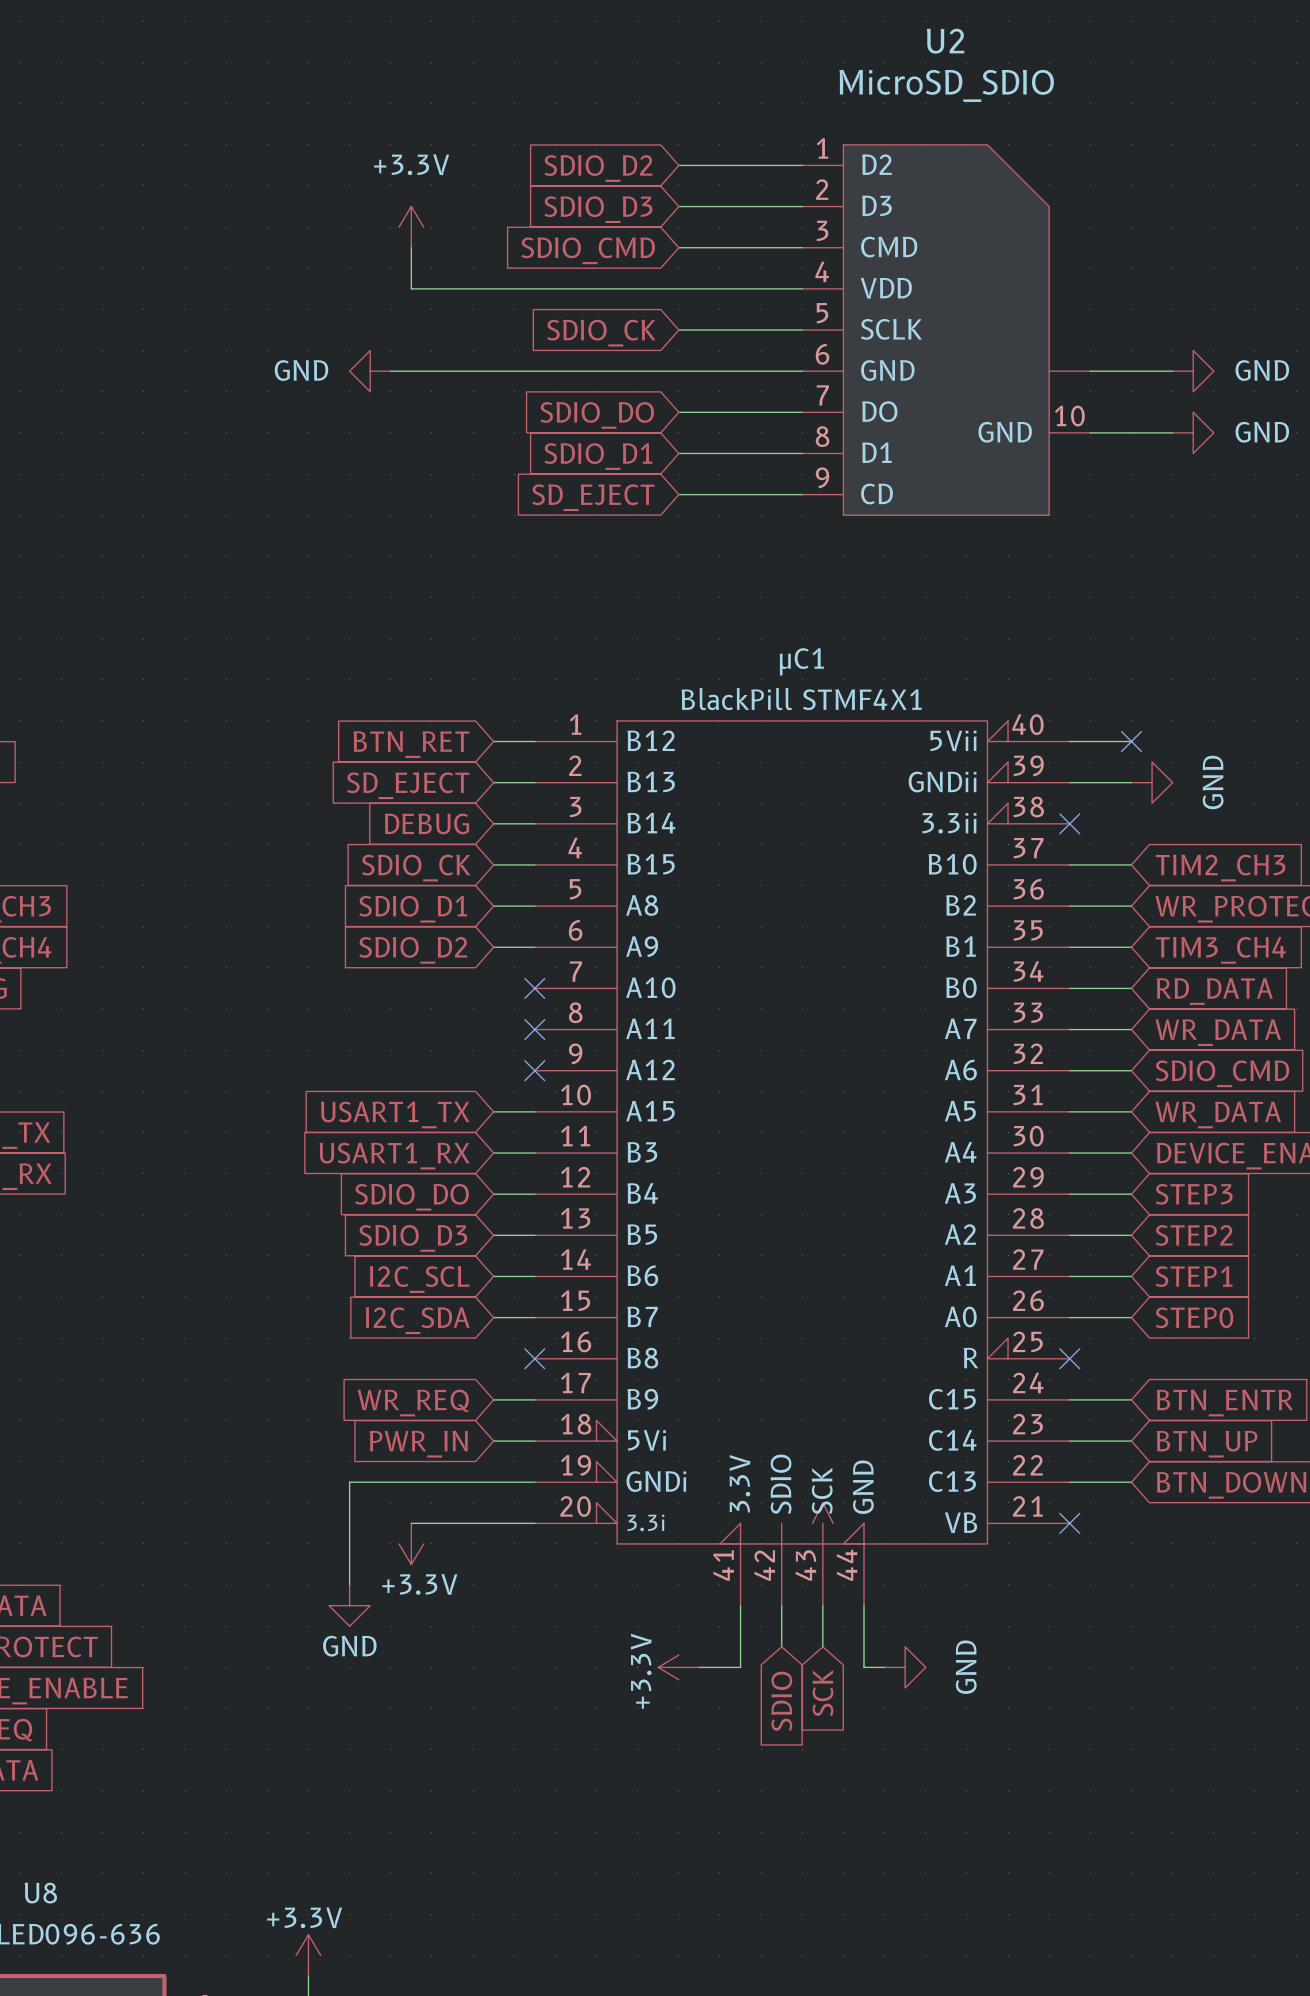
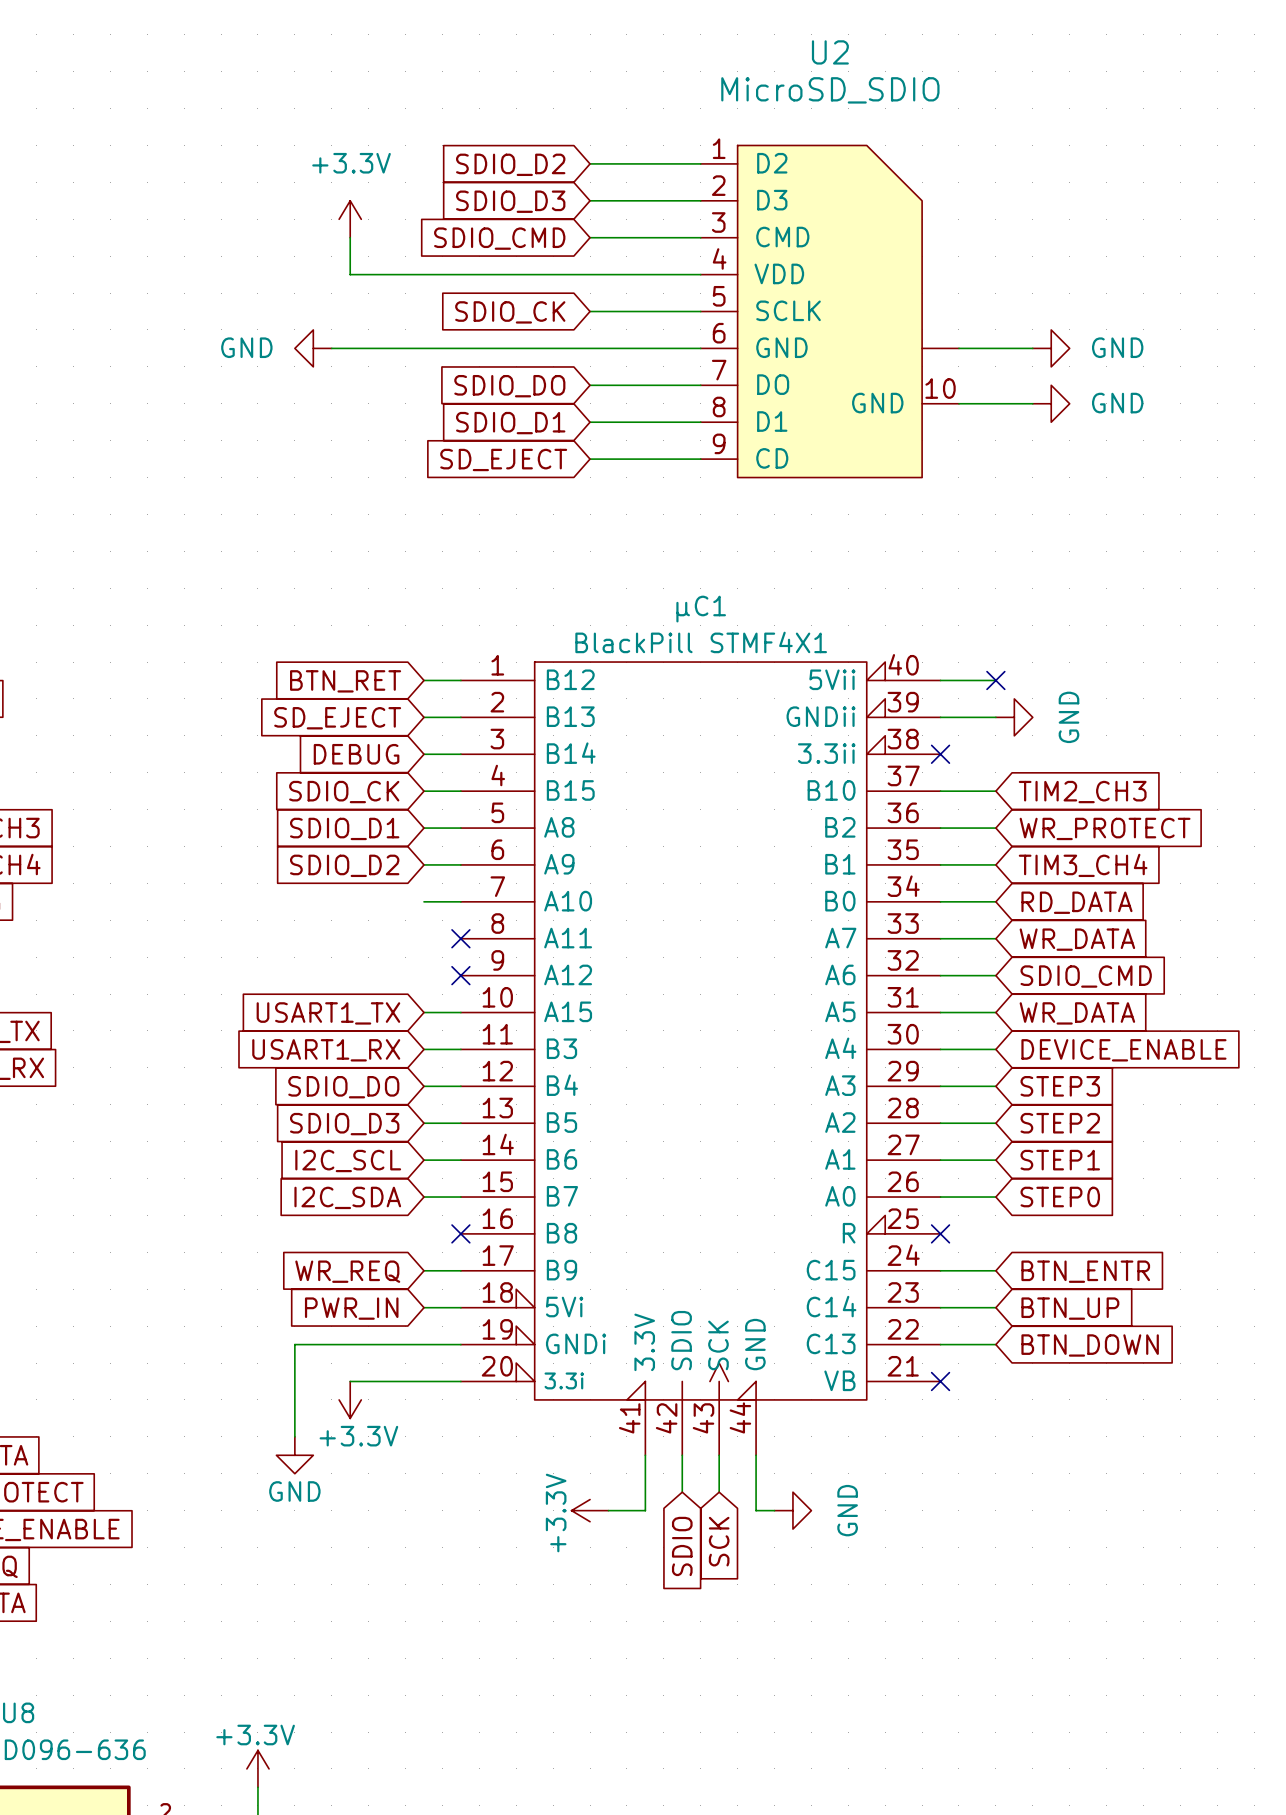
wire: none -> (424, 901) (460, 901)
no-connect mark: (534, 988) -> none

